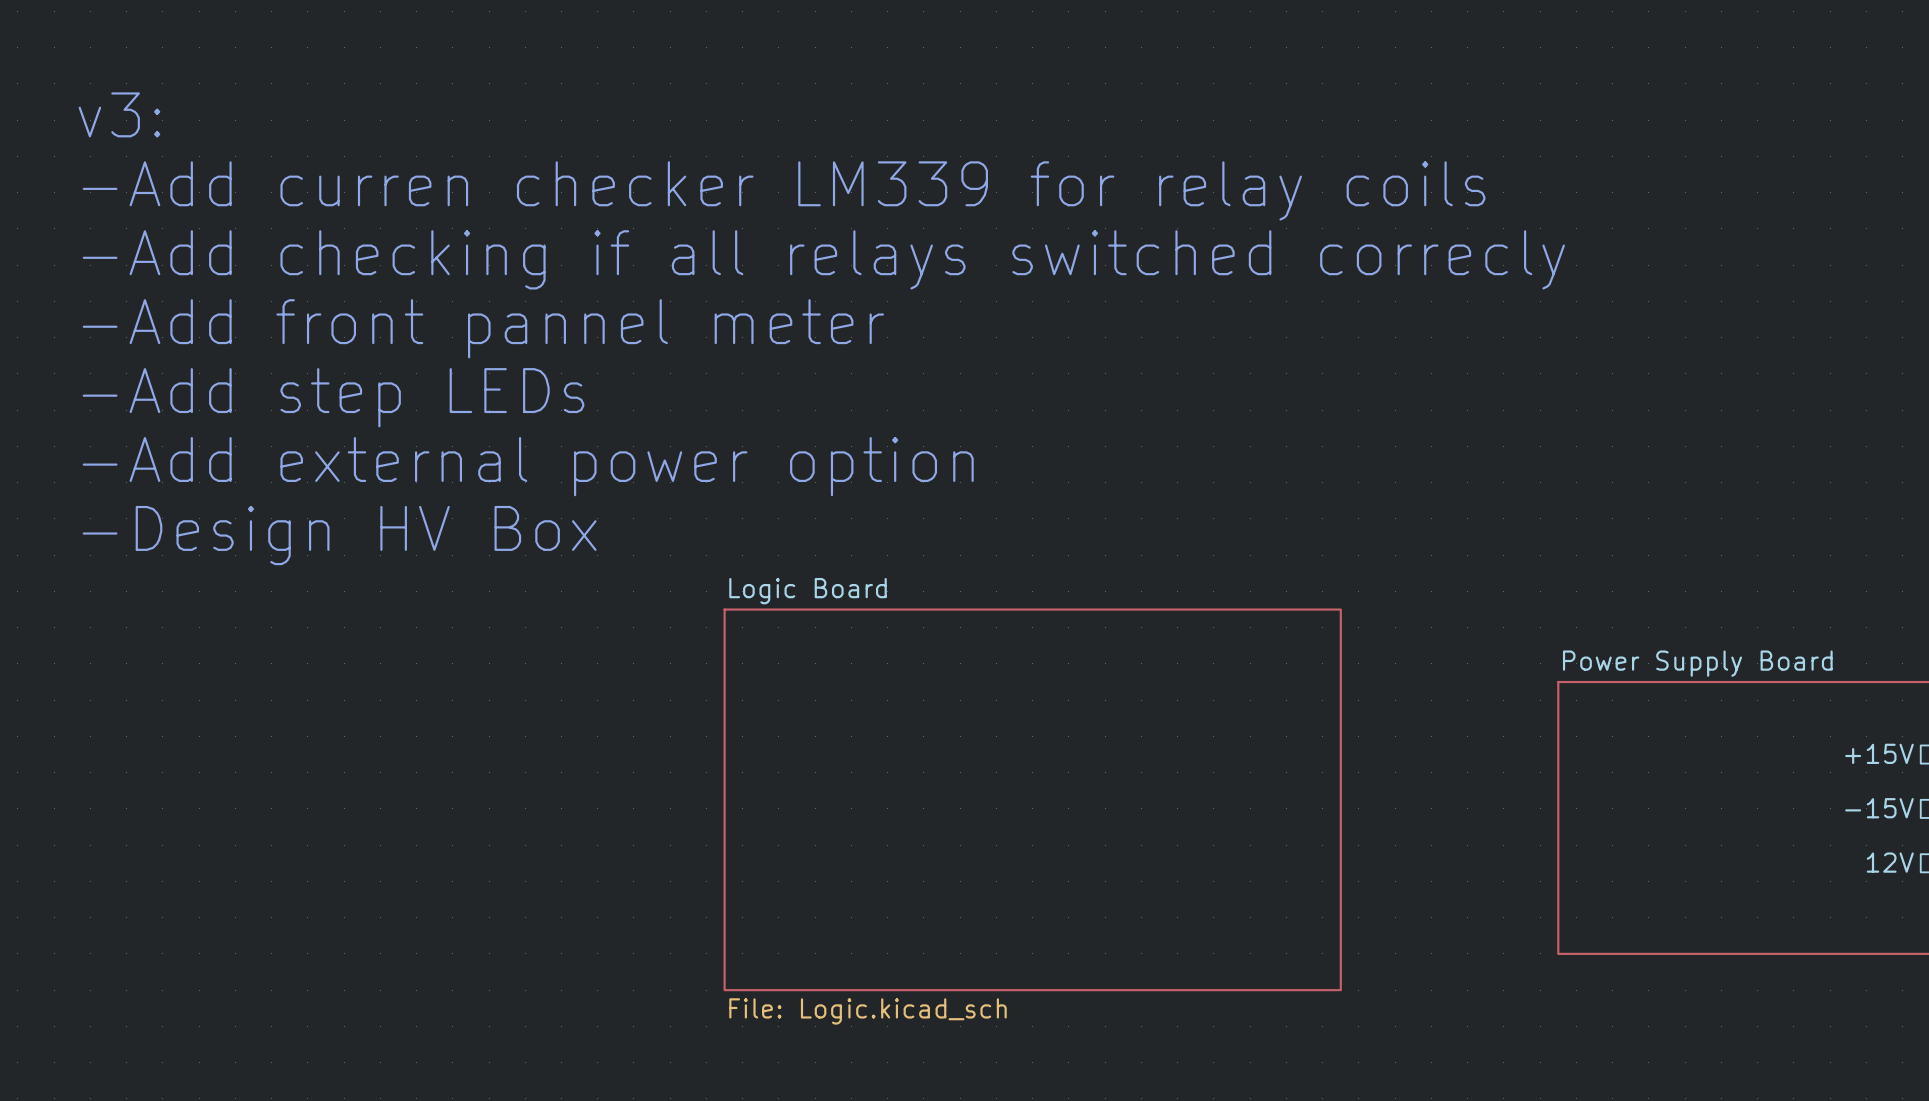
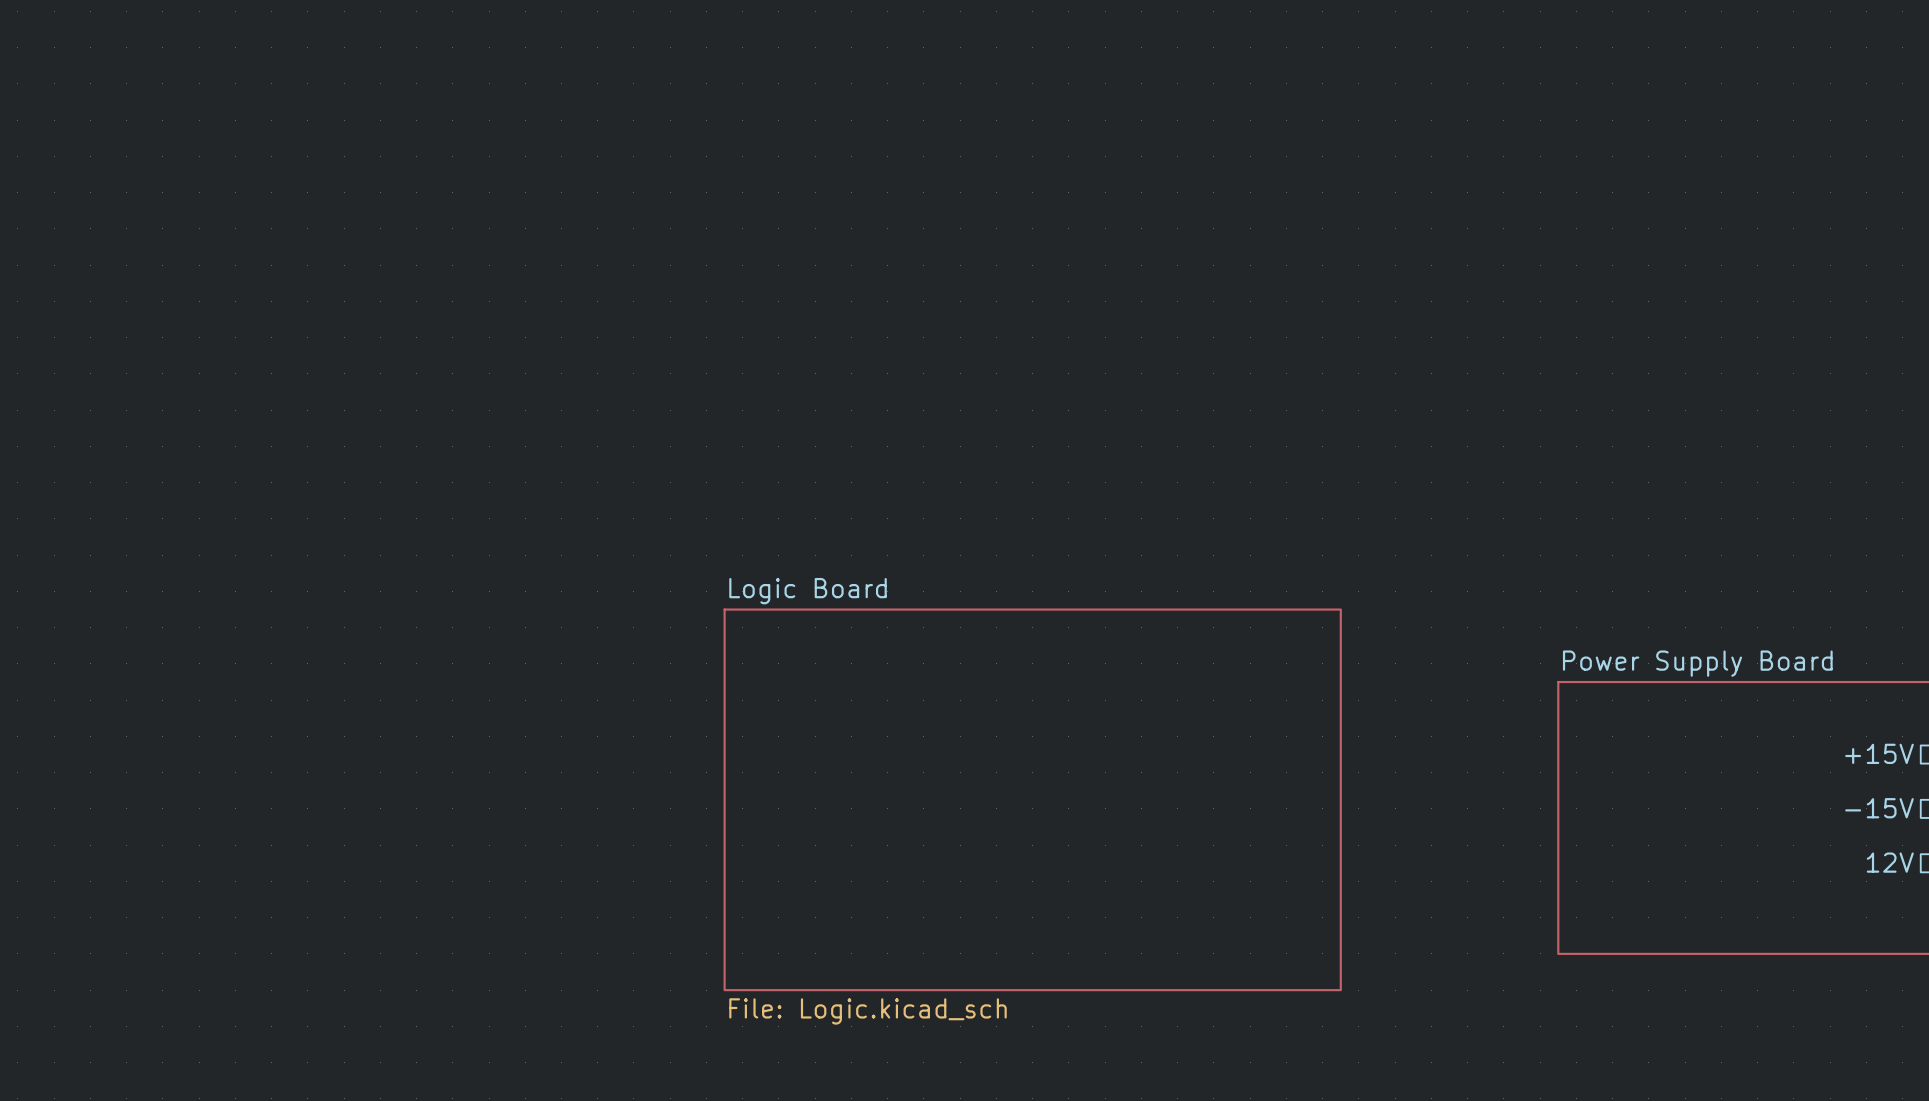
text: v3: (119, 114) -> none
text: -Add curren checker LM339 for relay coils (784, 190) -> none
text: -Add checking if all relays switched correcly (823, 259) -> none
text: -Add front pannel meter (483, 328) -> none
text: -Add step LEDs (333, 397) -> none
text: -Add external power option (528, 466) -> none
text: -Design HV Box (339, 535) -> none

